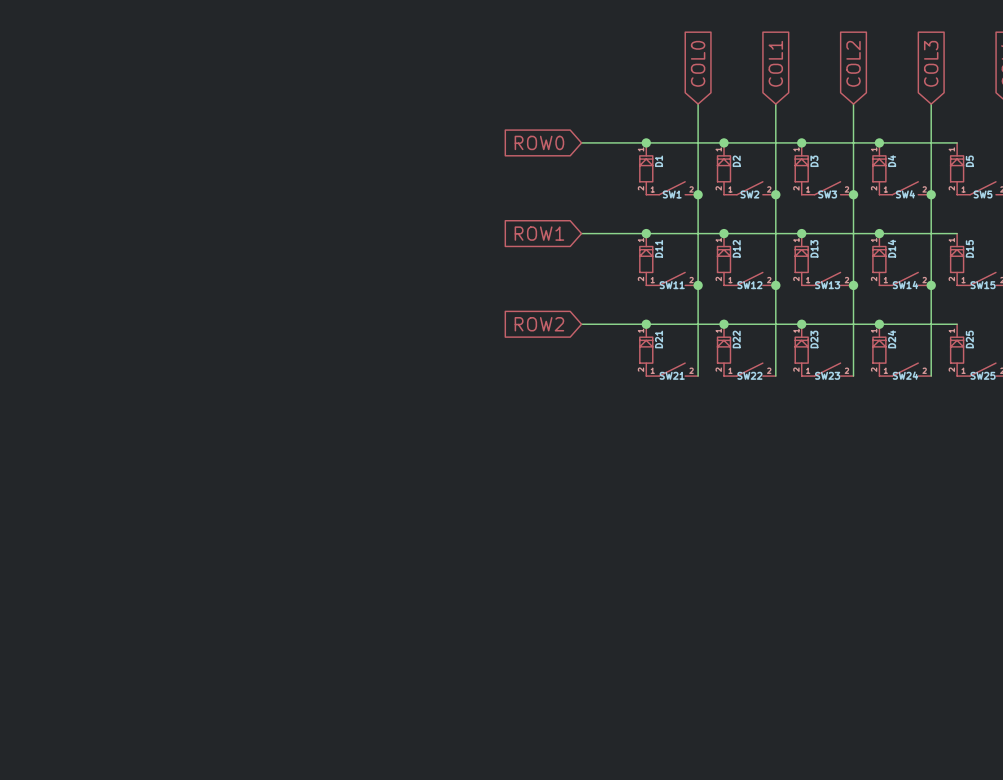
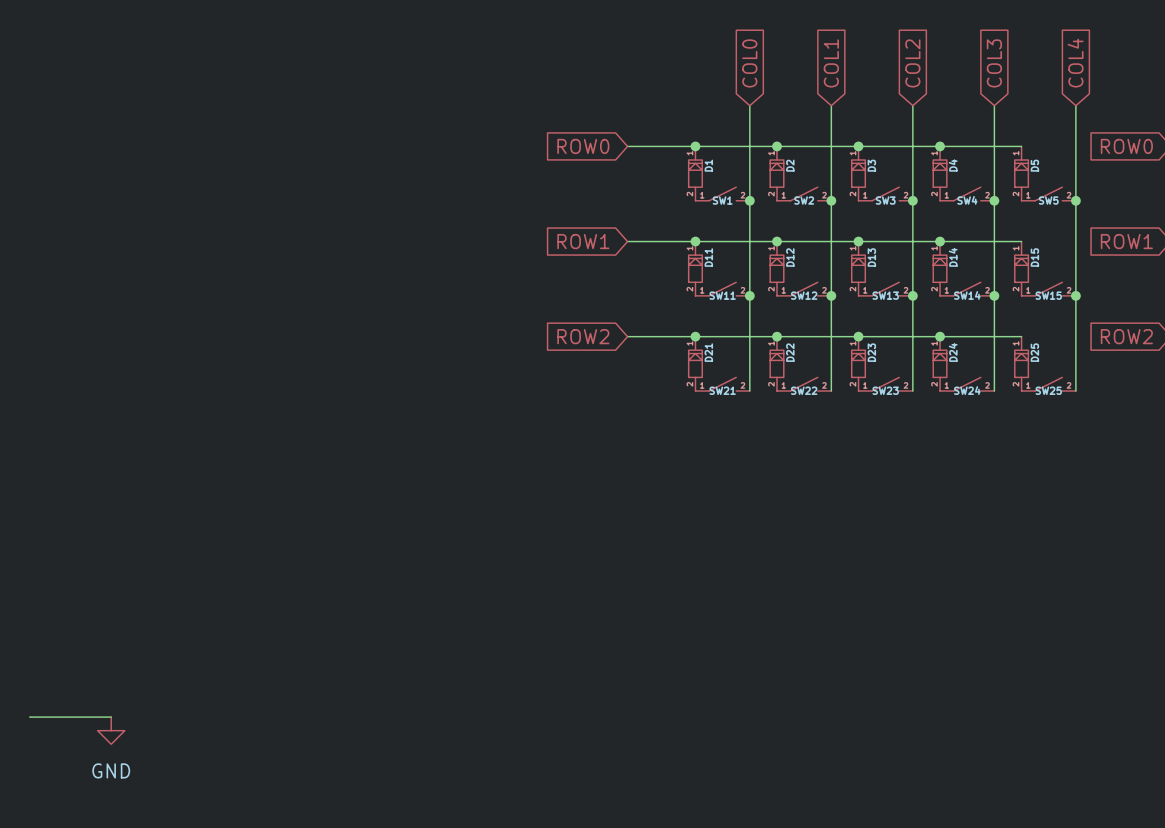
wire: none -> (29, 717) (111, 717)
power symbol: none -> GND (111, 730)

